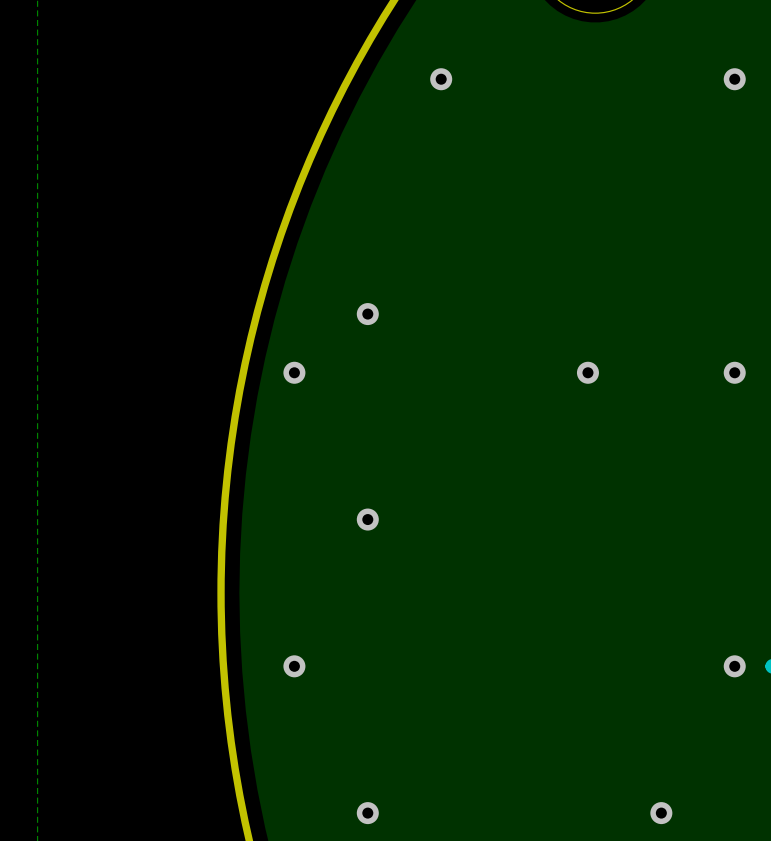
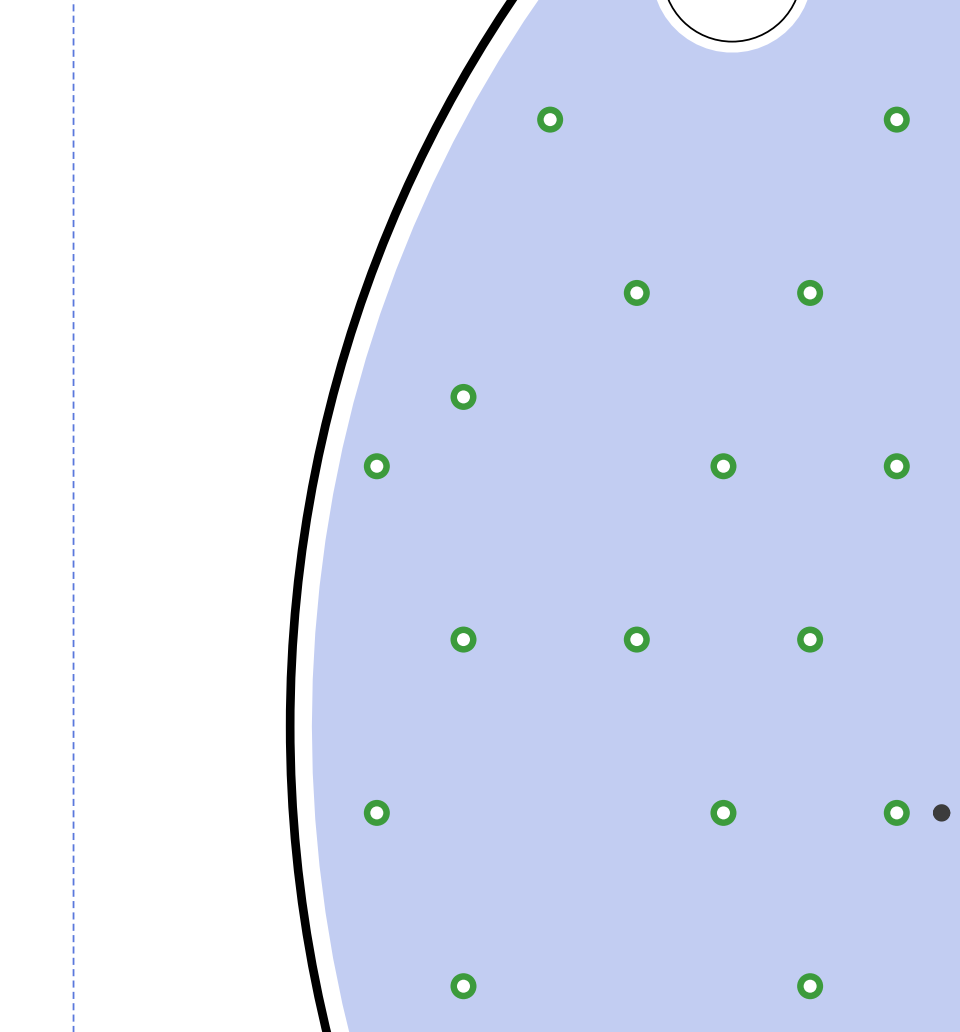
via: none -> (636, 292)
via: none -> (810, 292)
via: none -> (636, 639)
via: none -> (810, 639)
via: none -> (723, 812)

